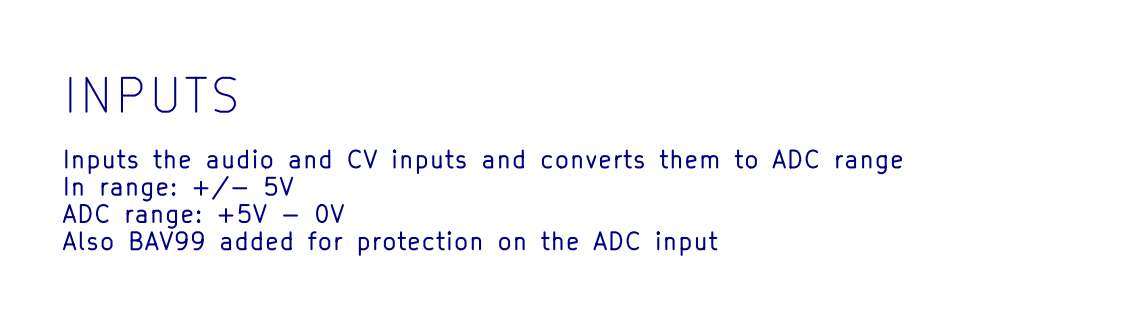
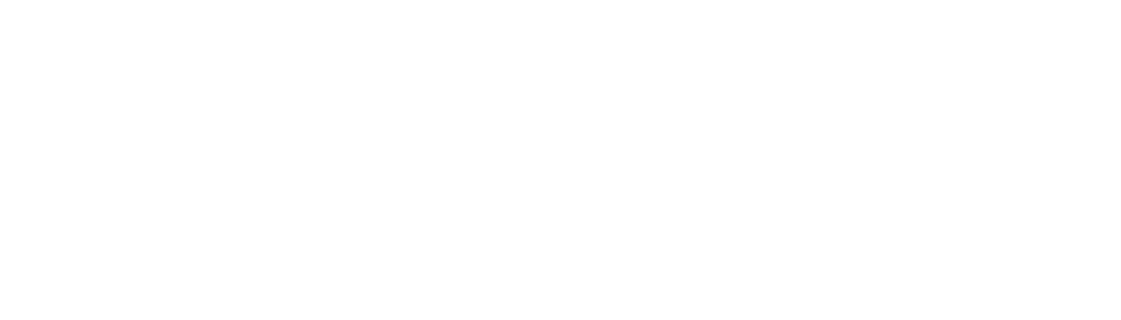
text: INPUTS (152, 94) -> none
text: Inputs the audio and CV inputs and converts them to ADC range (483, 161) -> none
text: In range: +/- 5V (179, 188) -> none
text: ADC range: +5V - 0V (203, 216) -> none
text: Also BAV99 added for protection on the ADC input (390, 243) -> none

